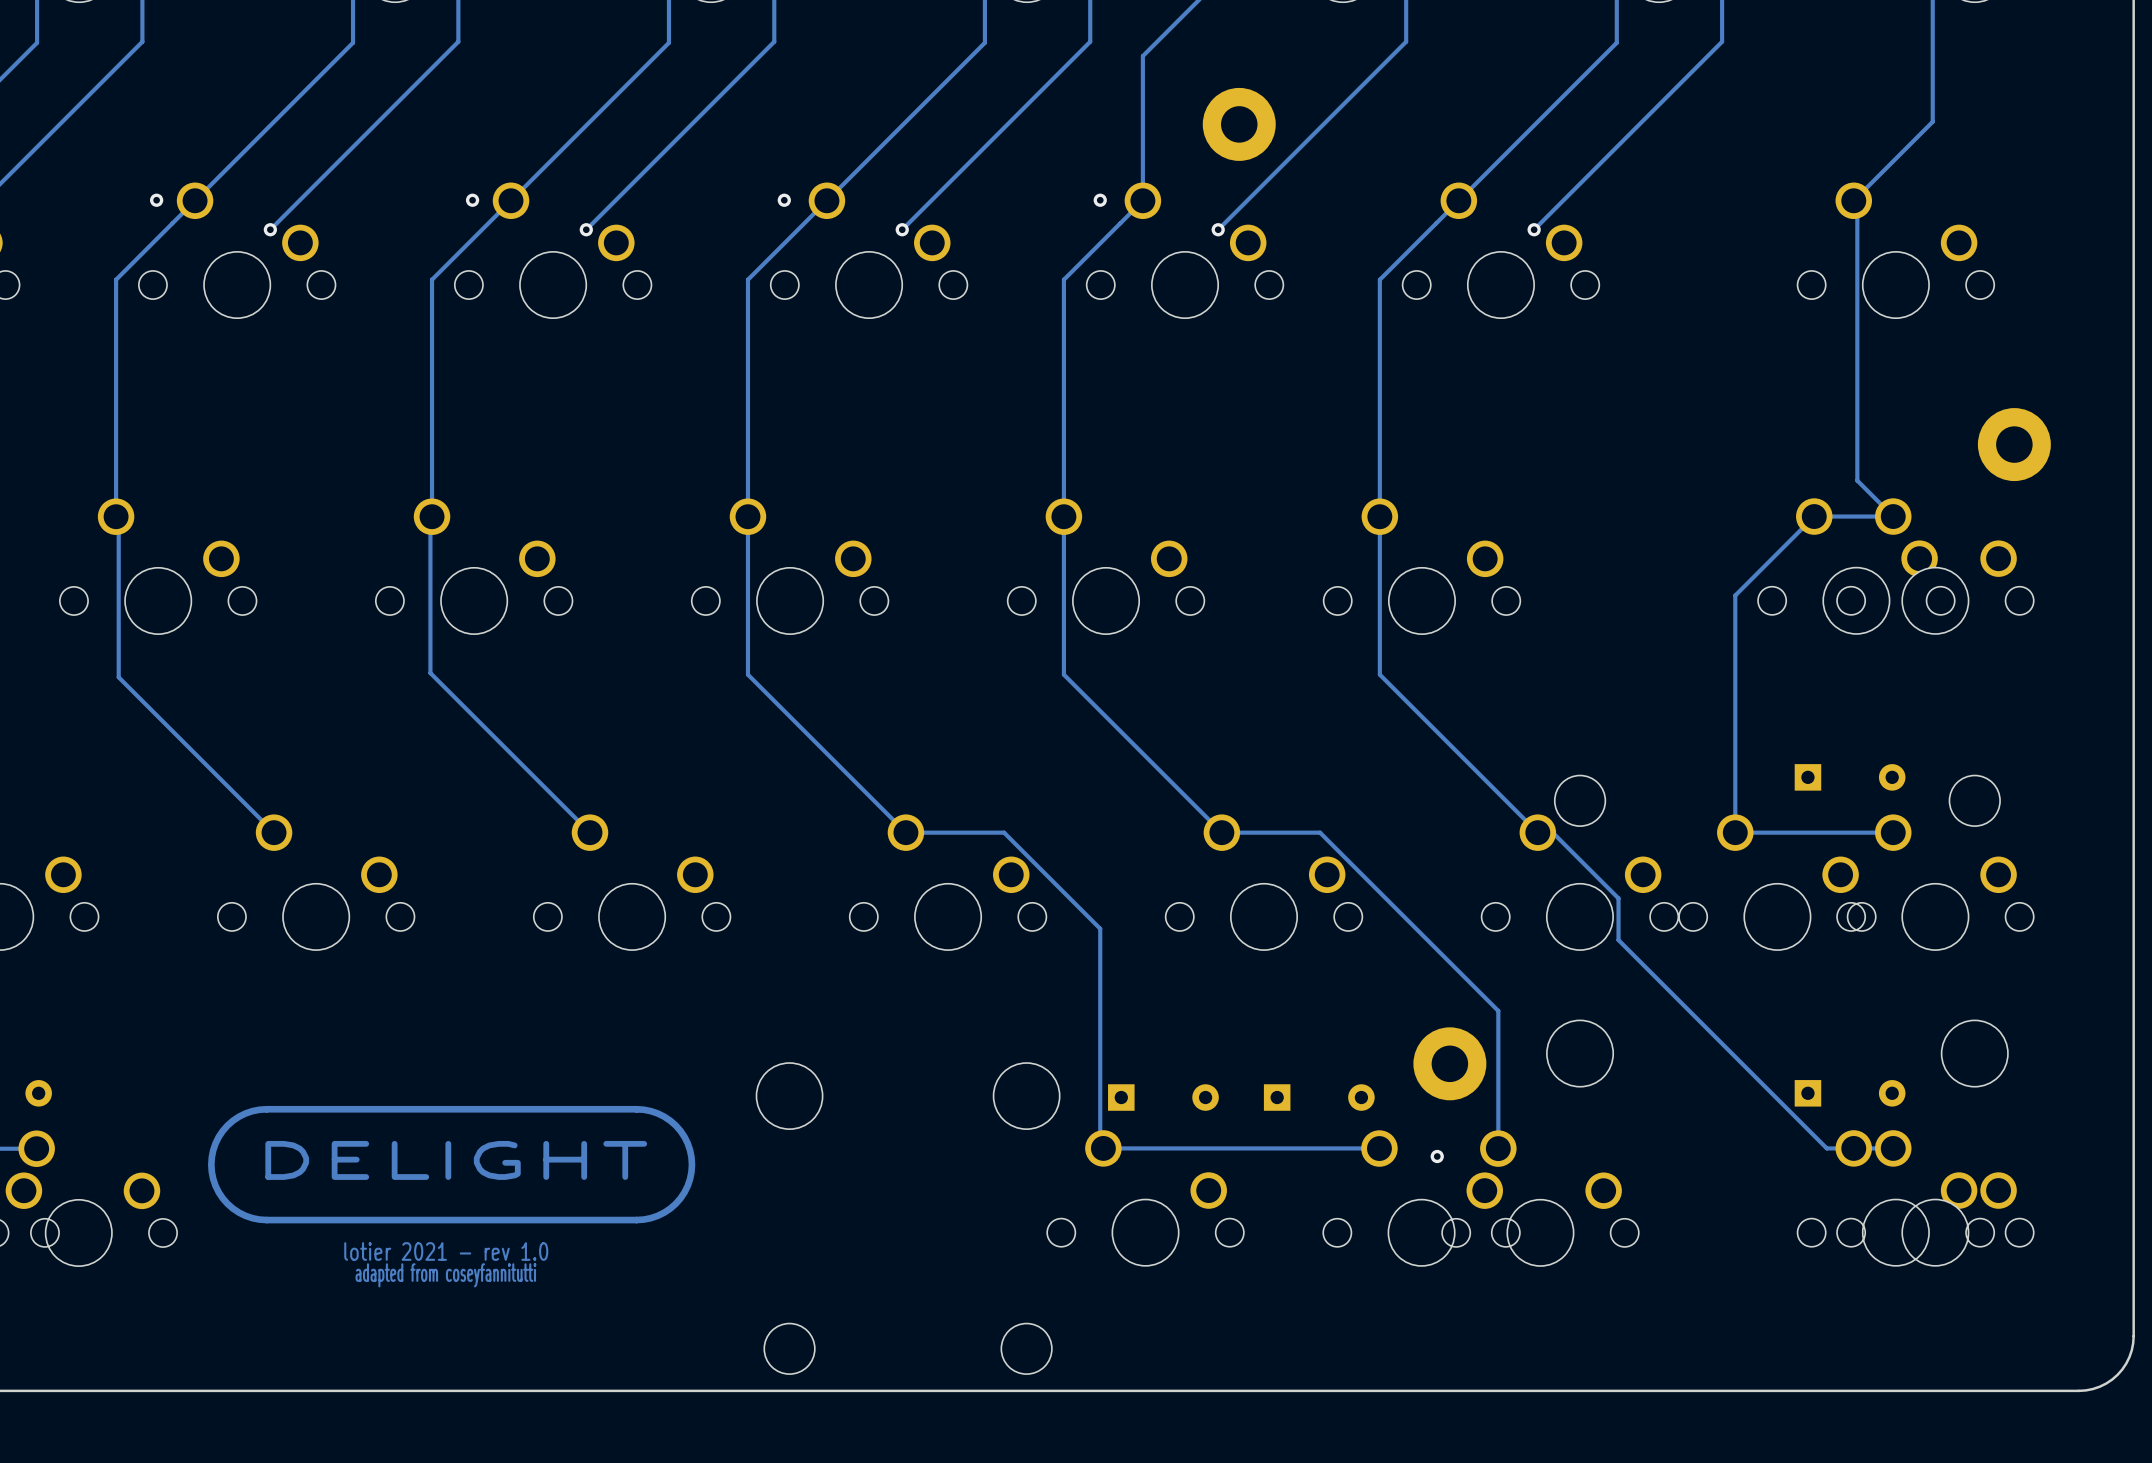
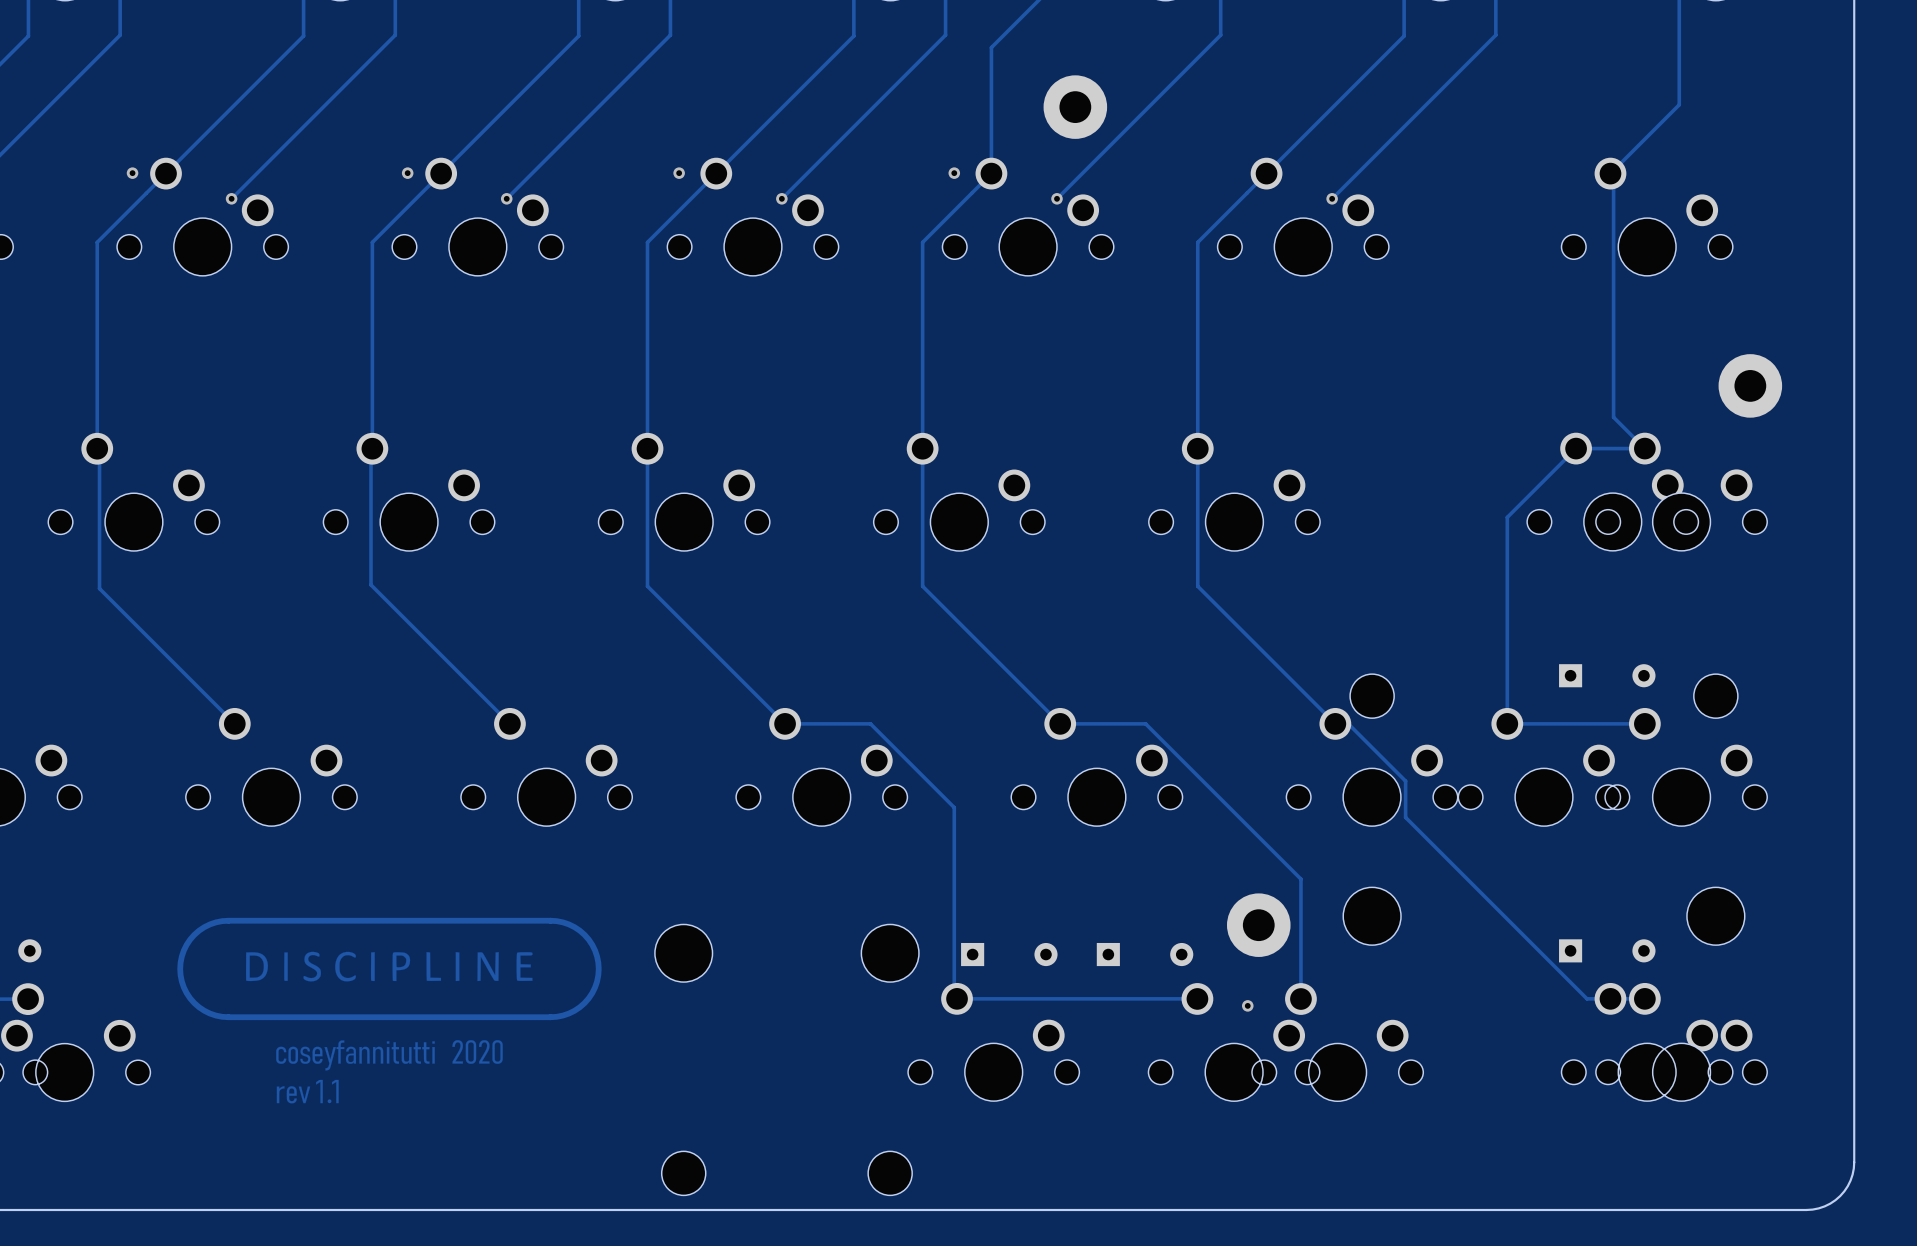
drawing: none -> [177, 917, 602, 1021]
drawing: [208, 1105, 696, 1224] -> none
drawing: none -> [276, 1040, 503, 1104]

